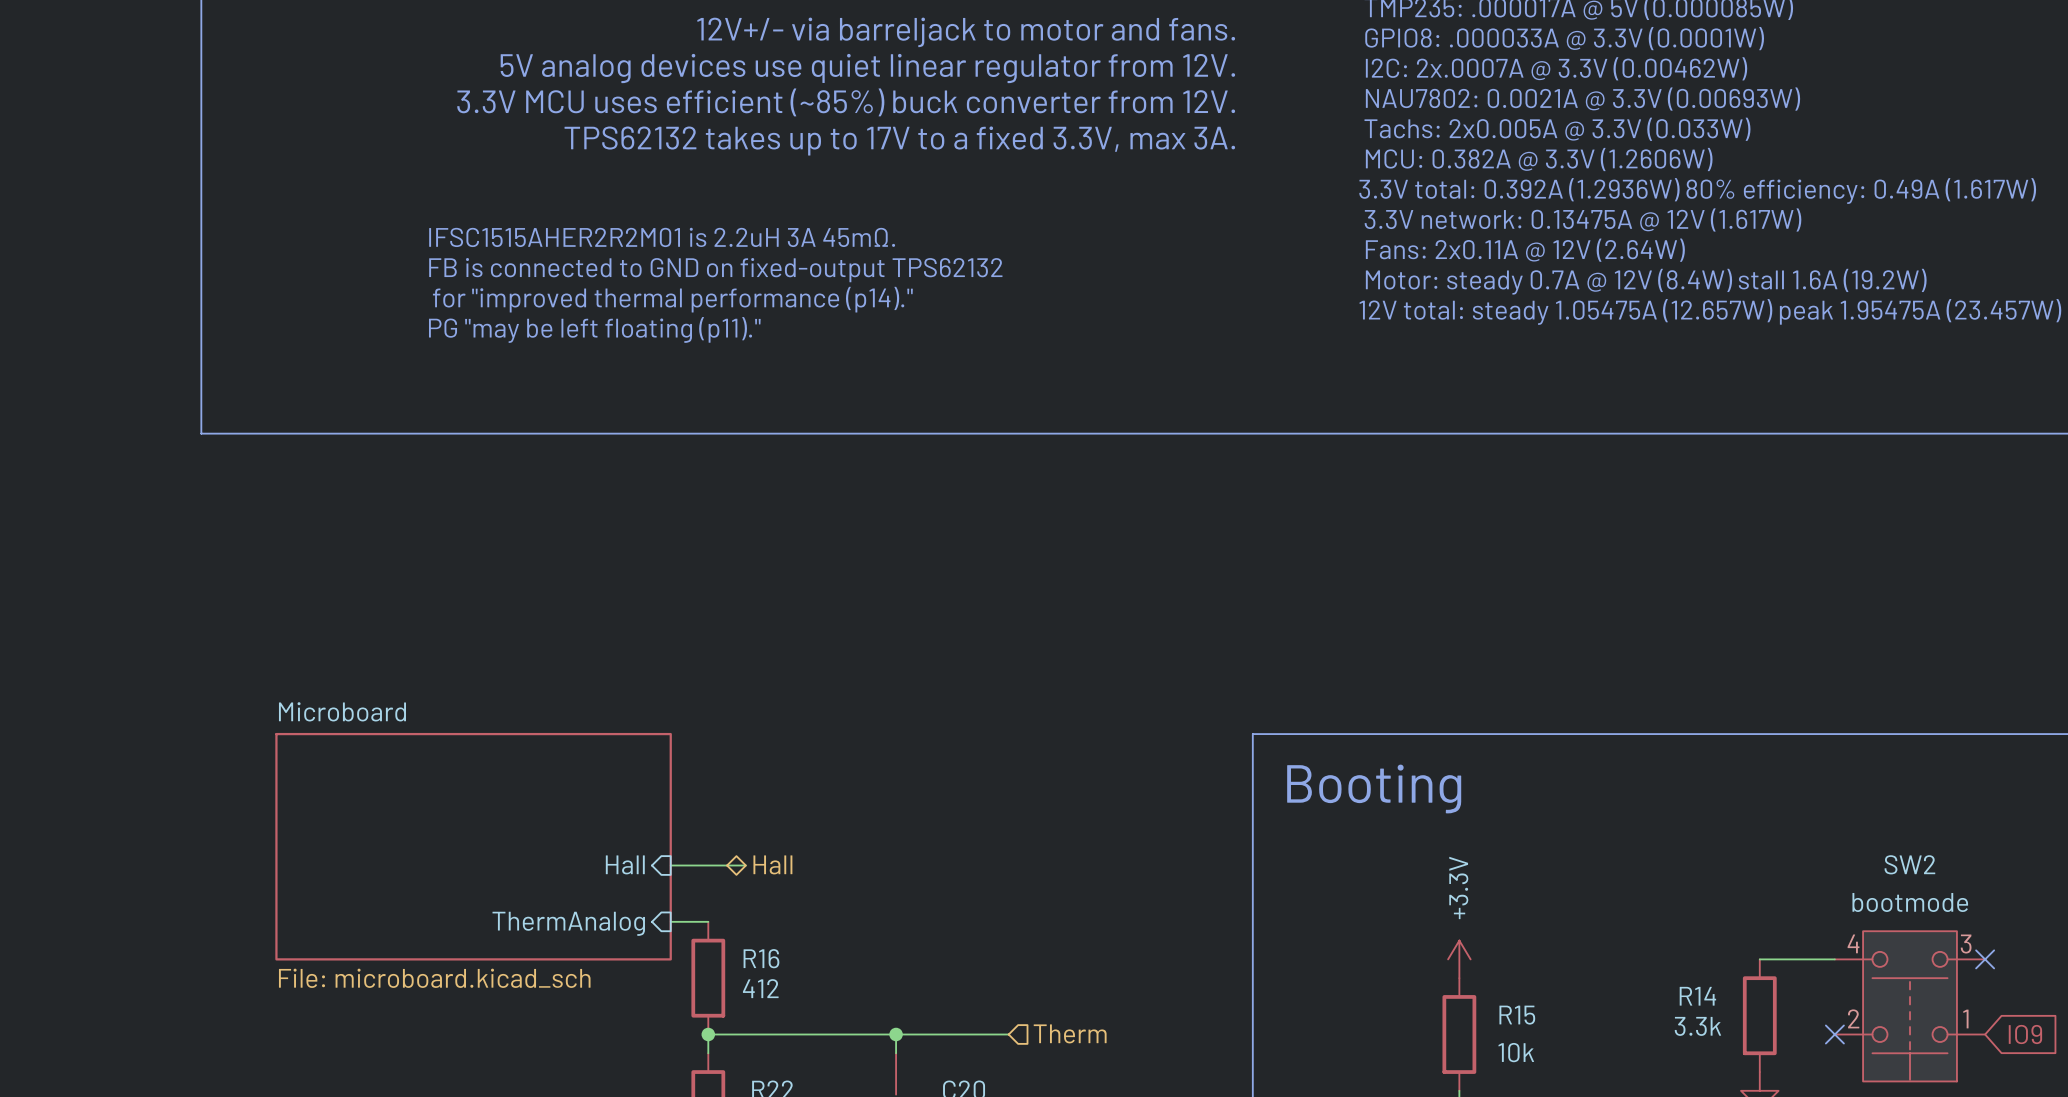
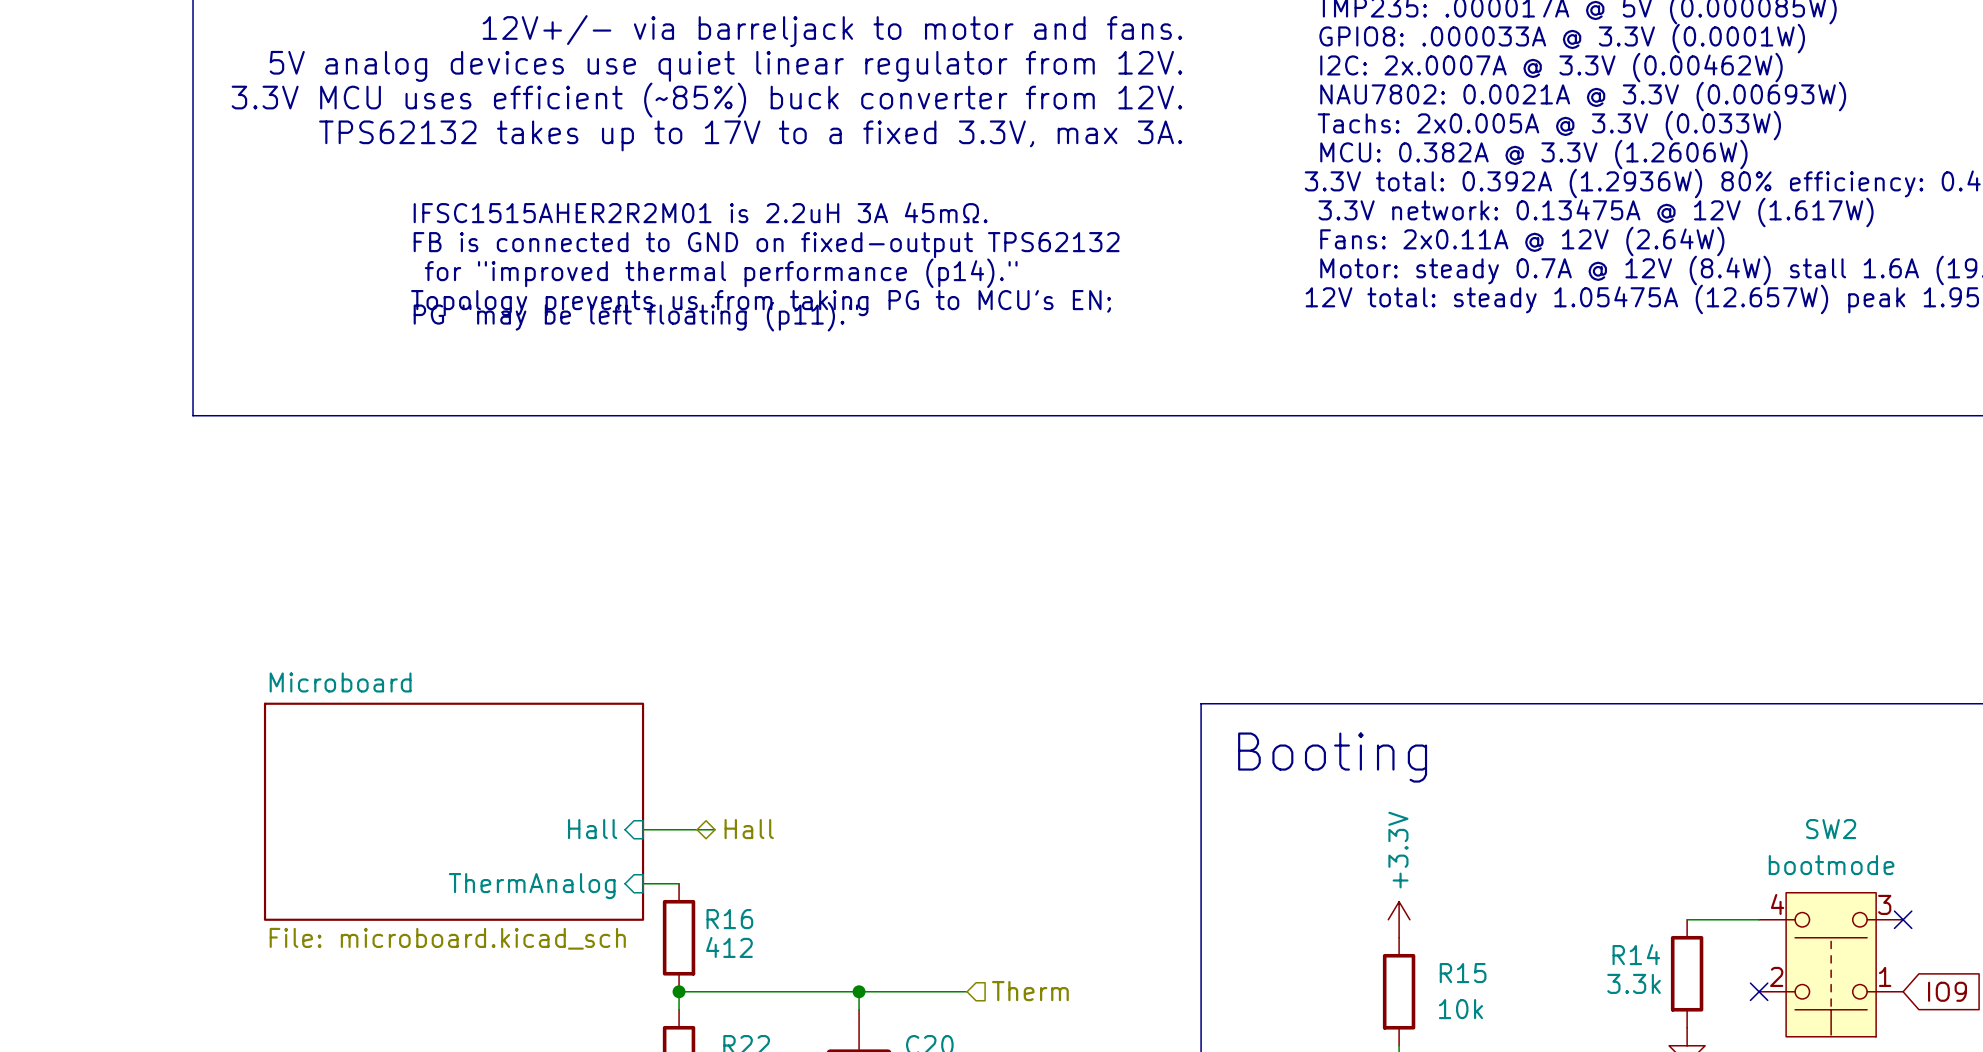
text position: IFSC1515AHER2R2M01 is 2.2uH 3A 45mΩ. (662, 237) -> IFSC1515AHER2R2M01 is 2.2uH 3A 45mΩ. (700, 212)
text position: FB is connected to GND on fixed-output TPS62132 (715, 270) -> FB is connected to GND on fixed-output TPS62132 (766, 245)
text position: for "improved thermal performance (p14)." (672, 299) -> for "improved thermal performance (p14)." (721, 273)
text: none -> Topology prevents us from taking PG to MCU's EN; (761, 303)

